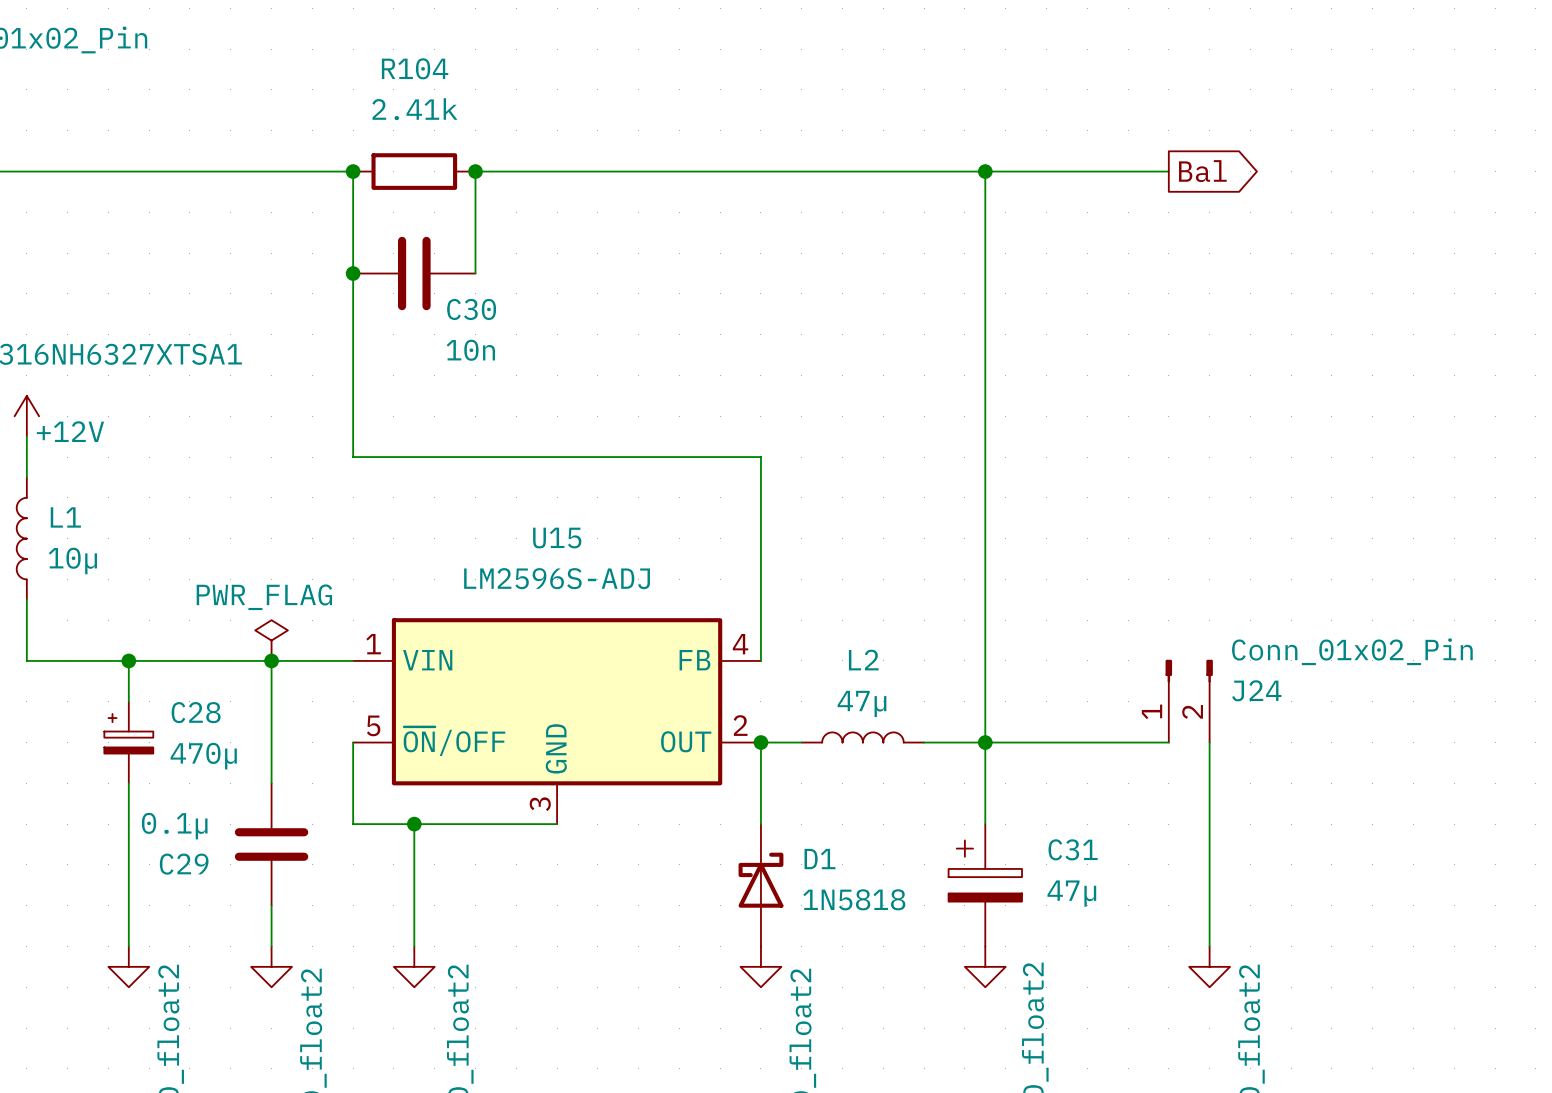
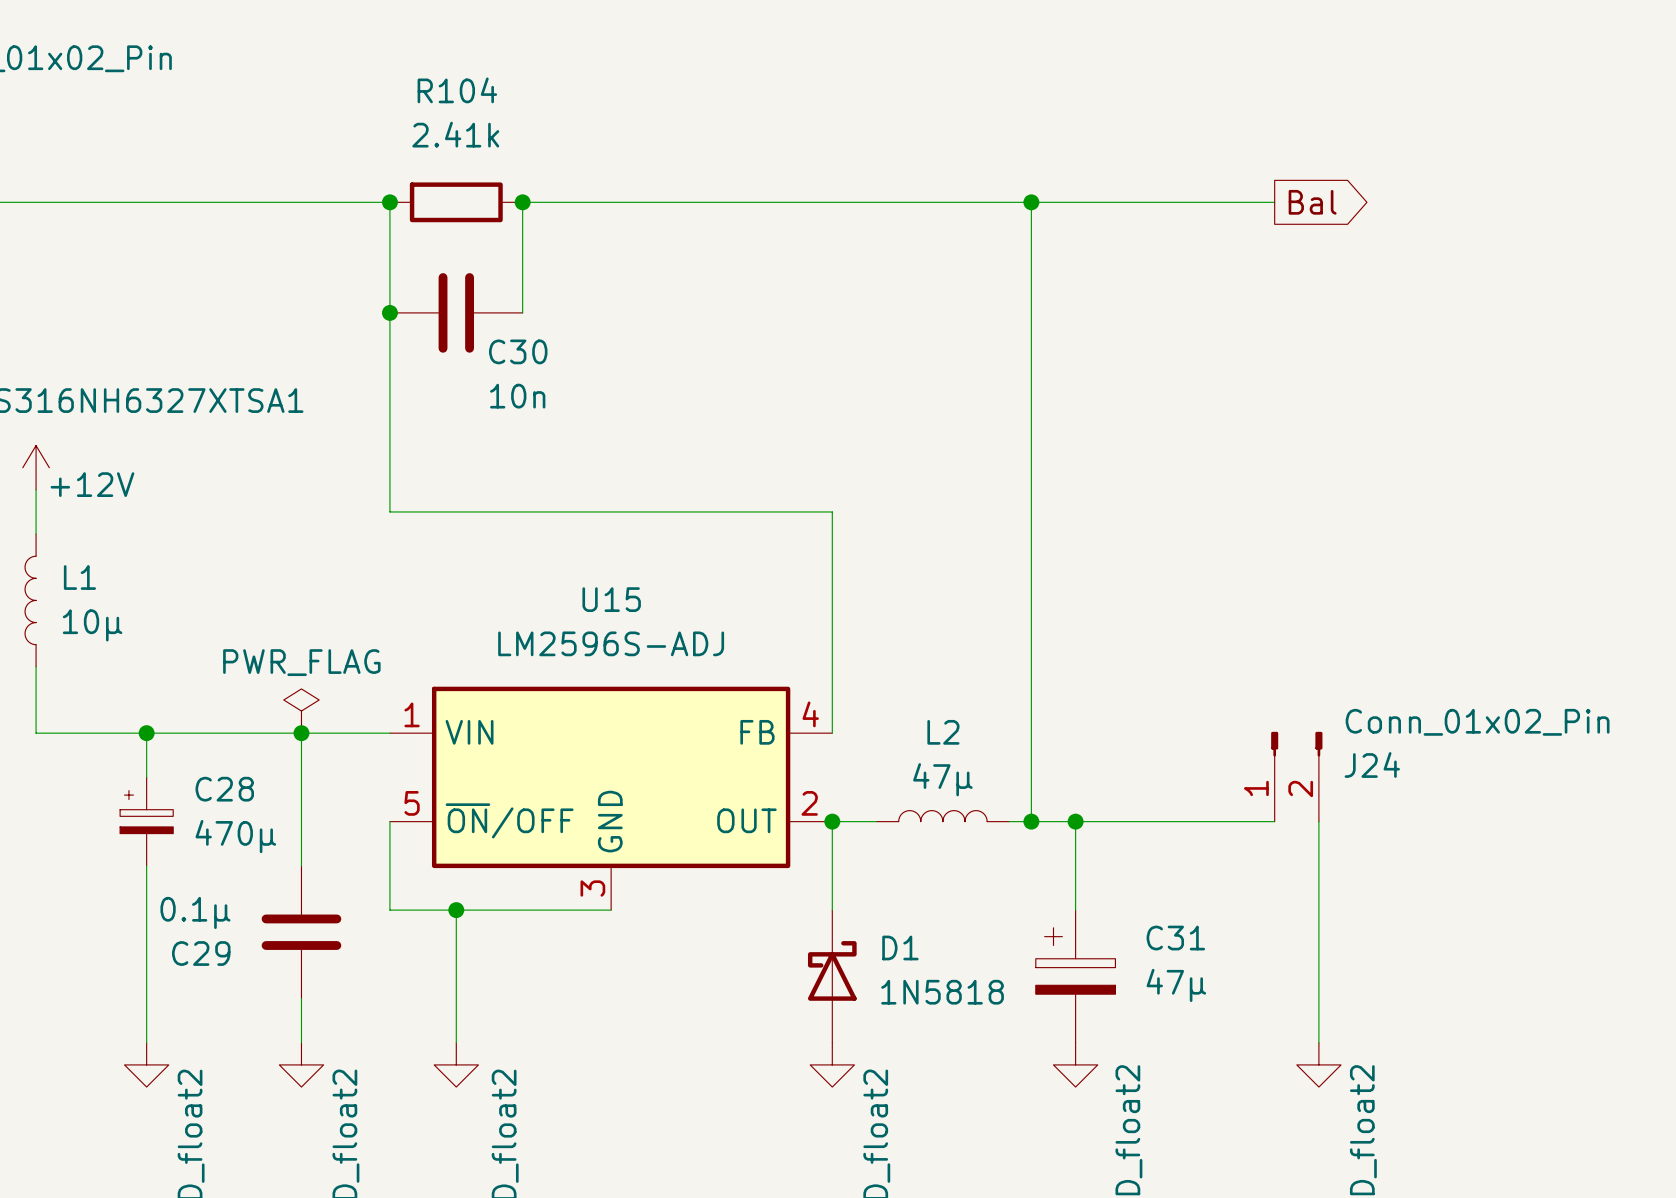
wire: (985, 171) (985, 742) -> (1031, 202) (1031, 821)
junction position: (985, 171) -> (1031, 202)
junction: none -> (1031, 821)

